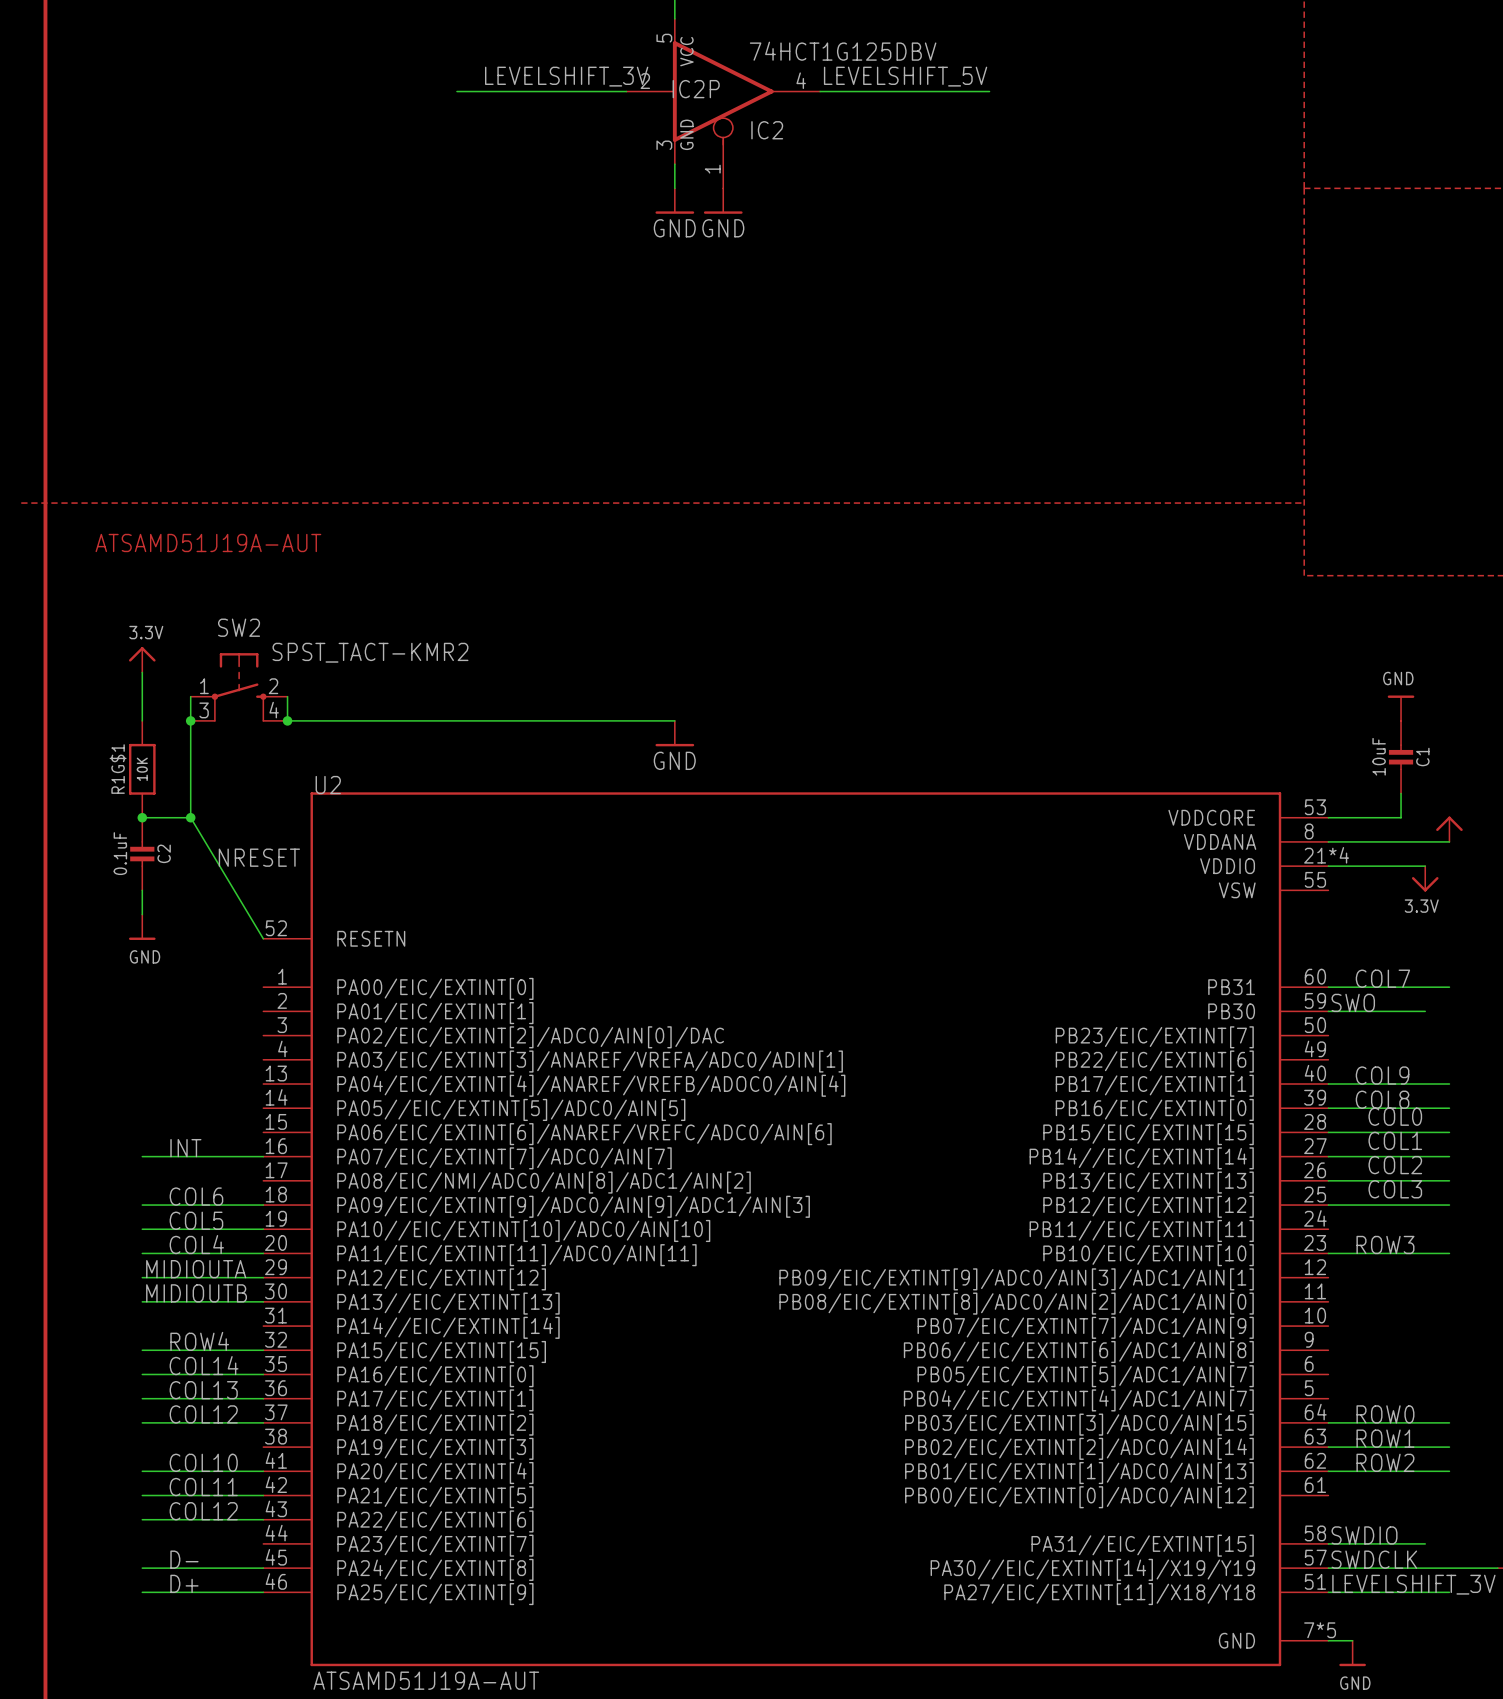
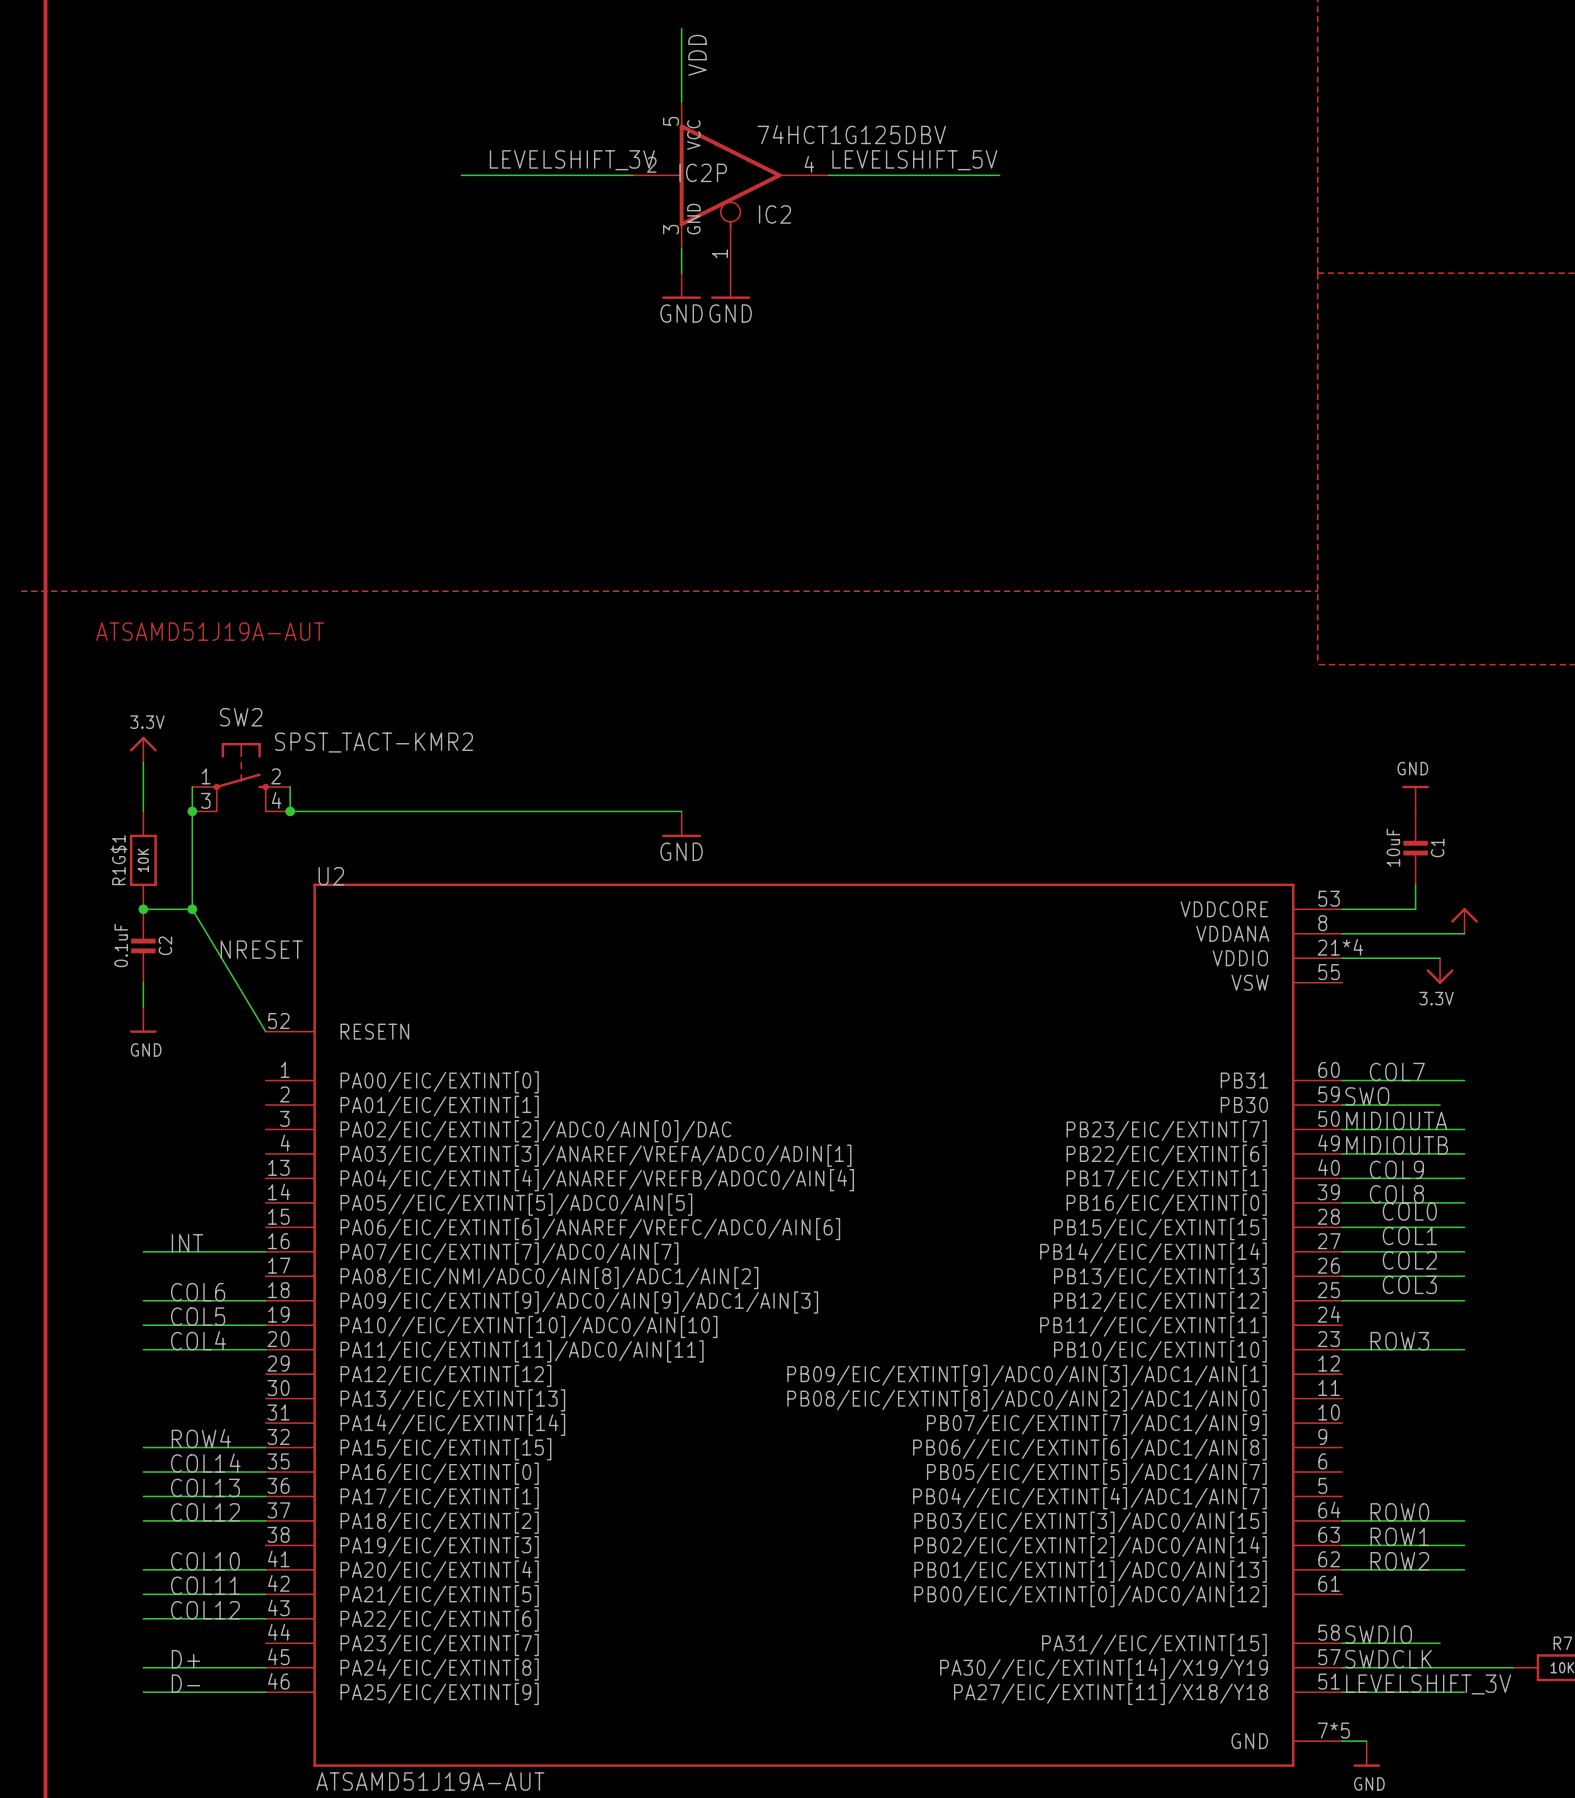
label: none -> MIDIOUTA (1396, 1120)
wire: none -> (1342, 1129) (1464, 1129)
label: none -> MIDIOUTB (1397, 1145)
wire: none -> (1342, 1153) (1464, 1153)
label: MIDIOUTA (196, 1269) -> none
wire: (142, 1277) (263, 1277) -> none
label: MIDIOUTB (196, 1293) -> none
wire: (142, 1301) (263, 1301) -> none
label: D- (184, 1559) -> D+ (185, 1659)
label: D+ (184, 1583) -> D- (185, 1683)

